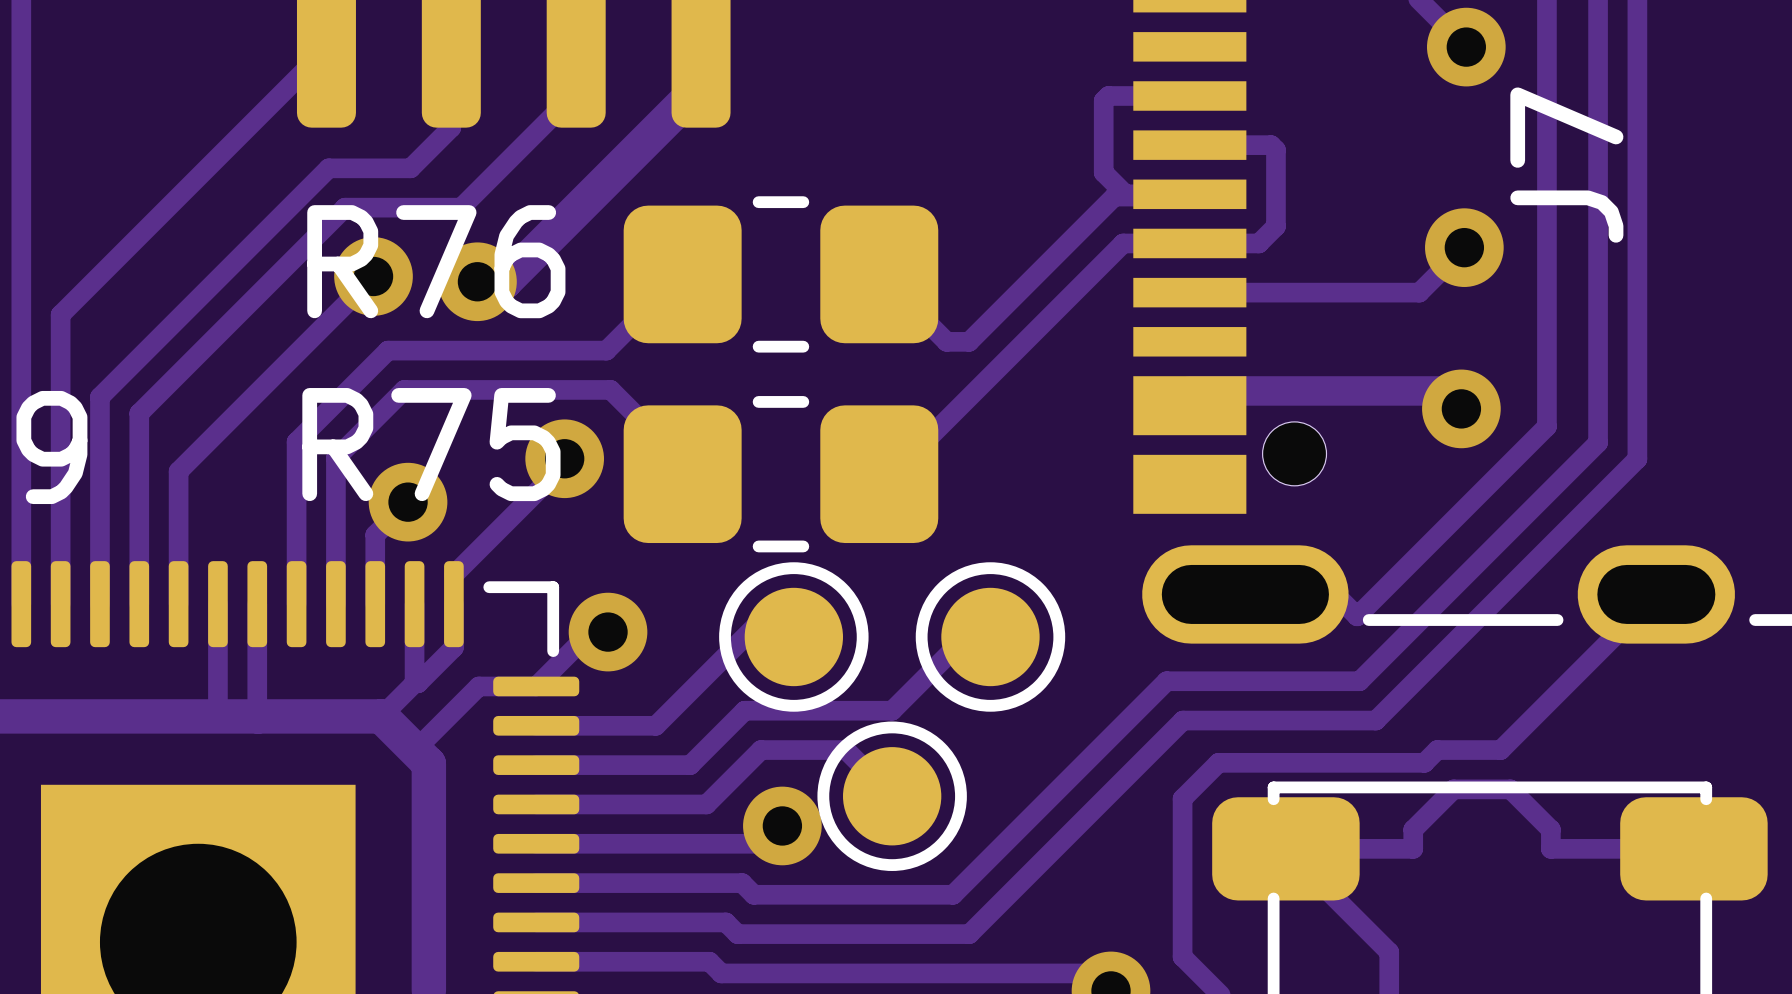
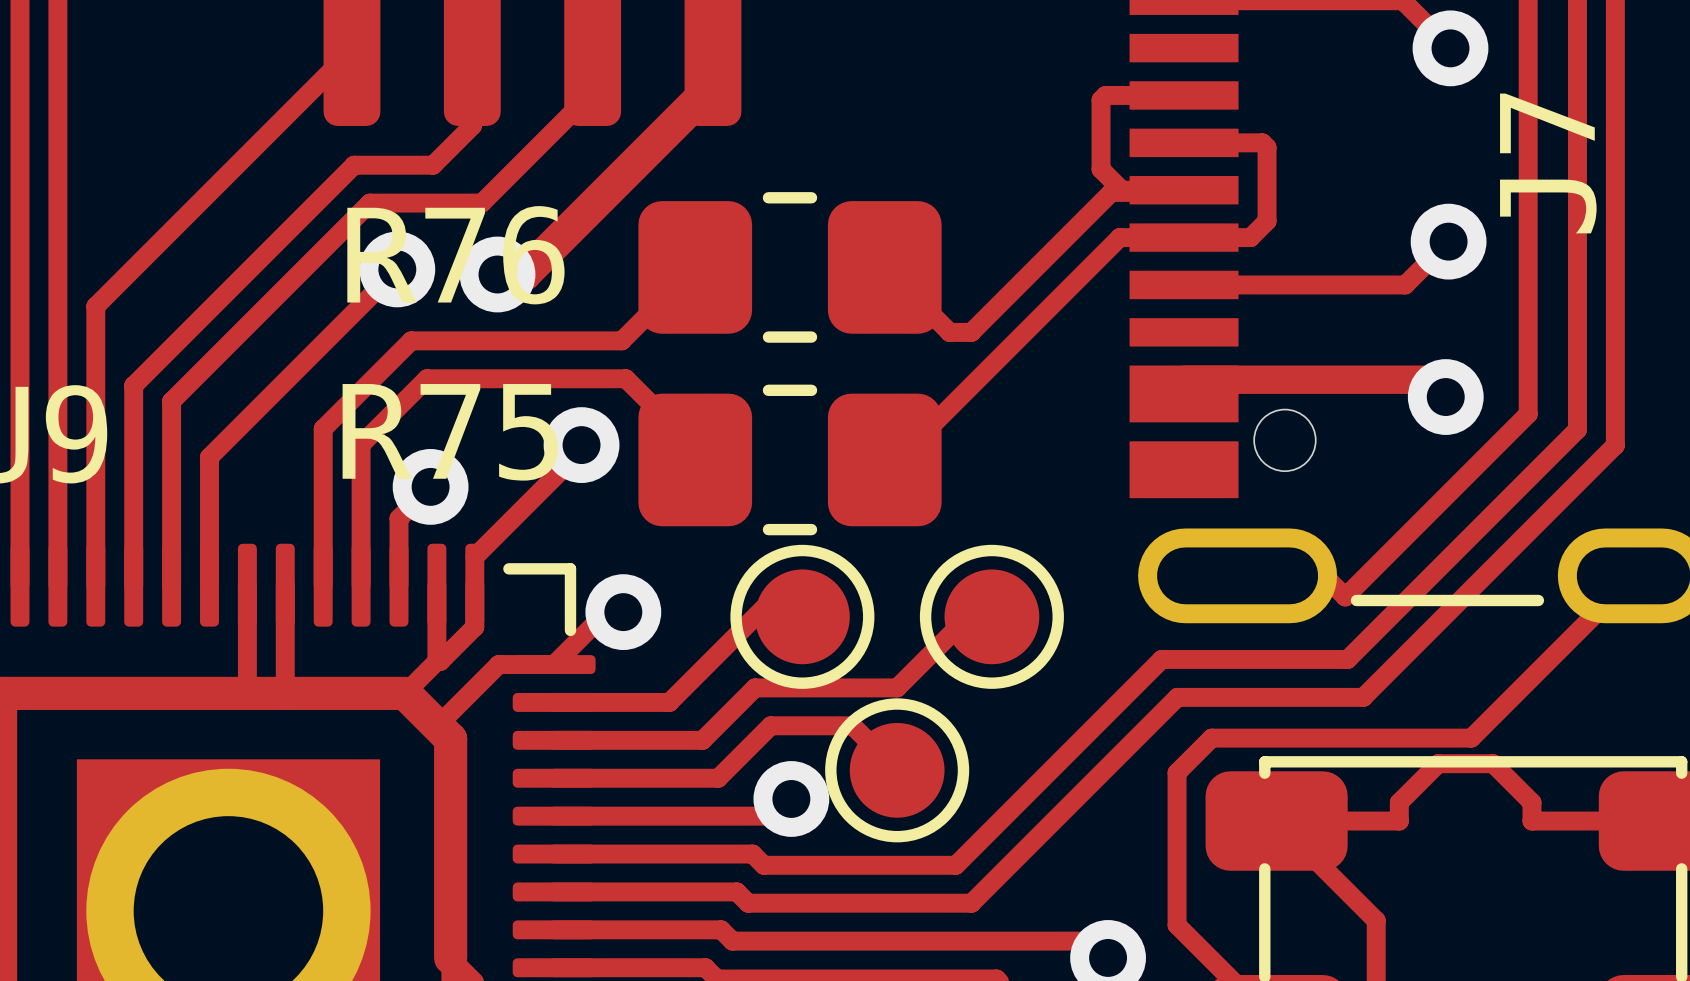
track: (1500, 750) (1437, 750) (1424, 762) -> (1483, 725) (1471, 738) (1410, 738)

